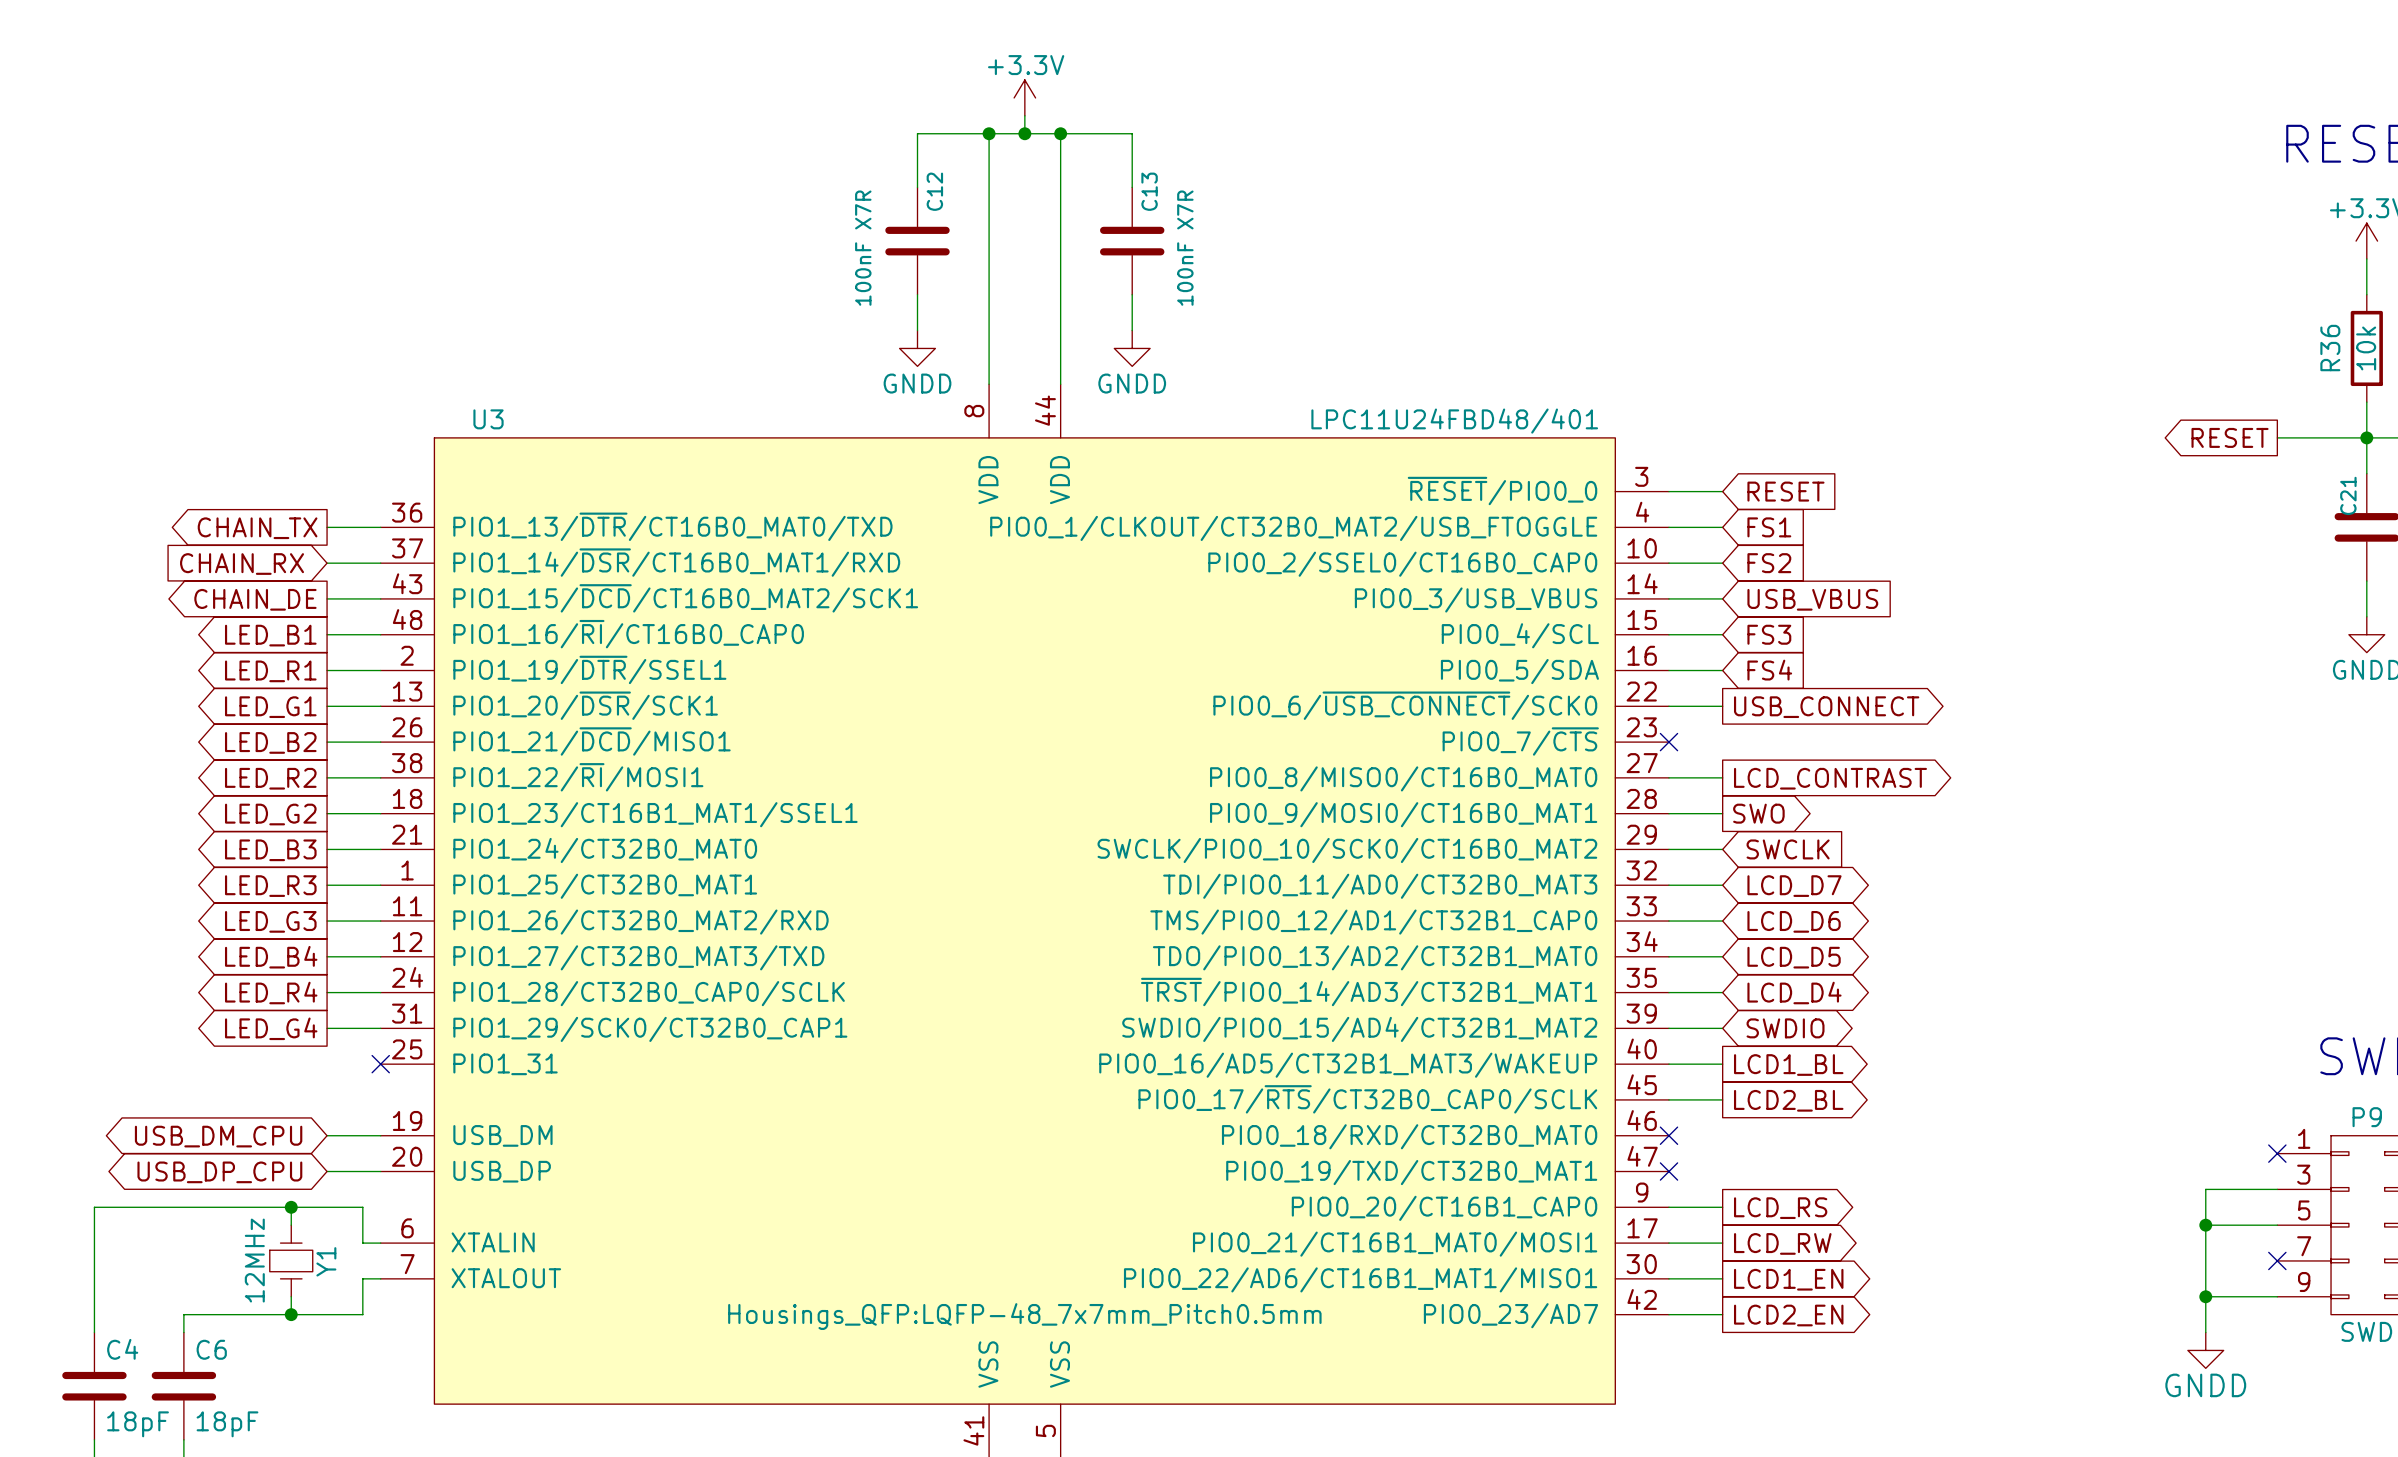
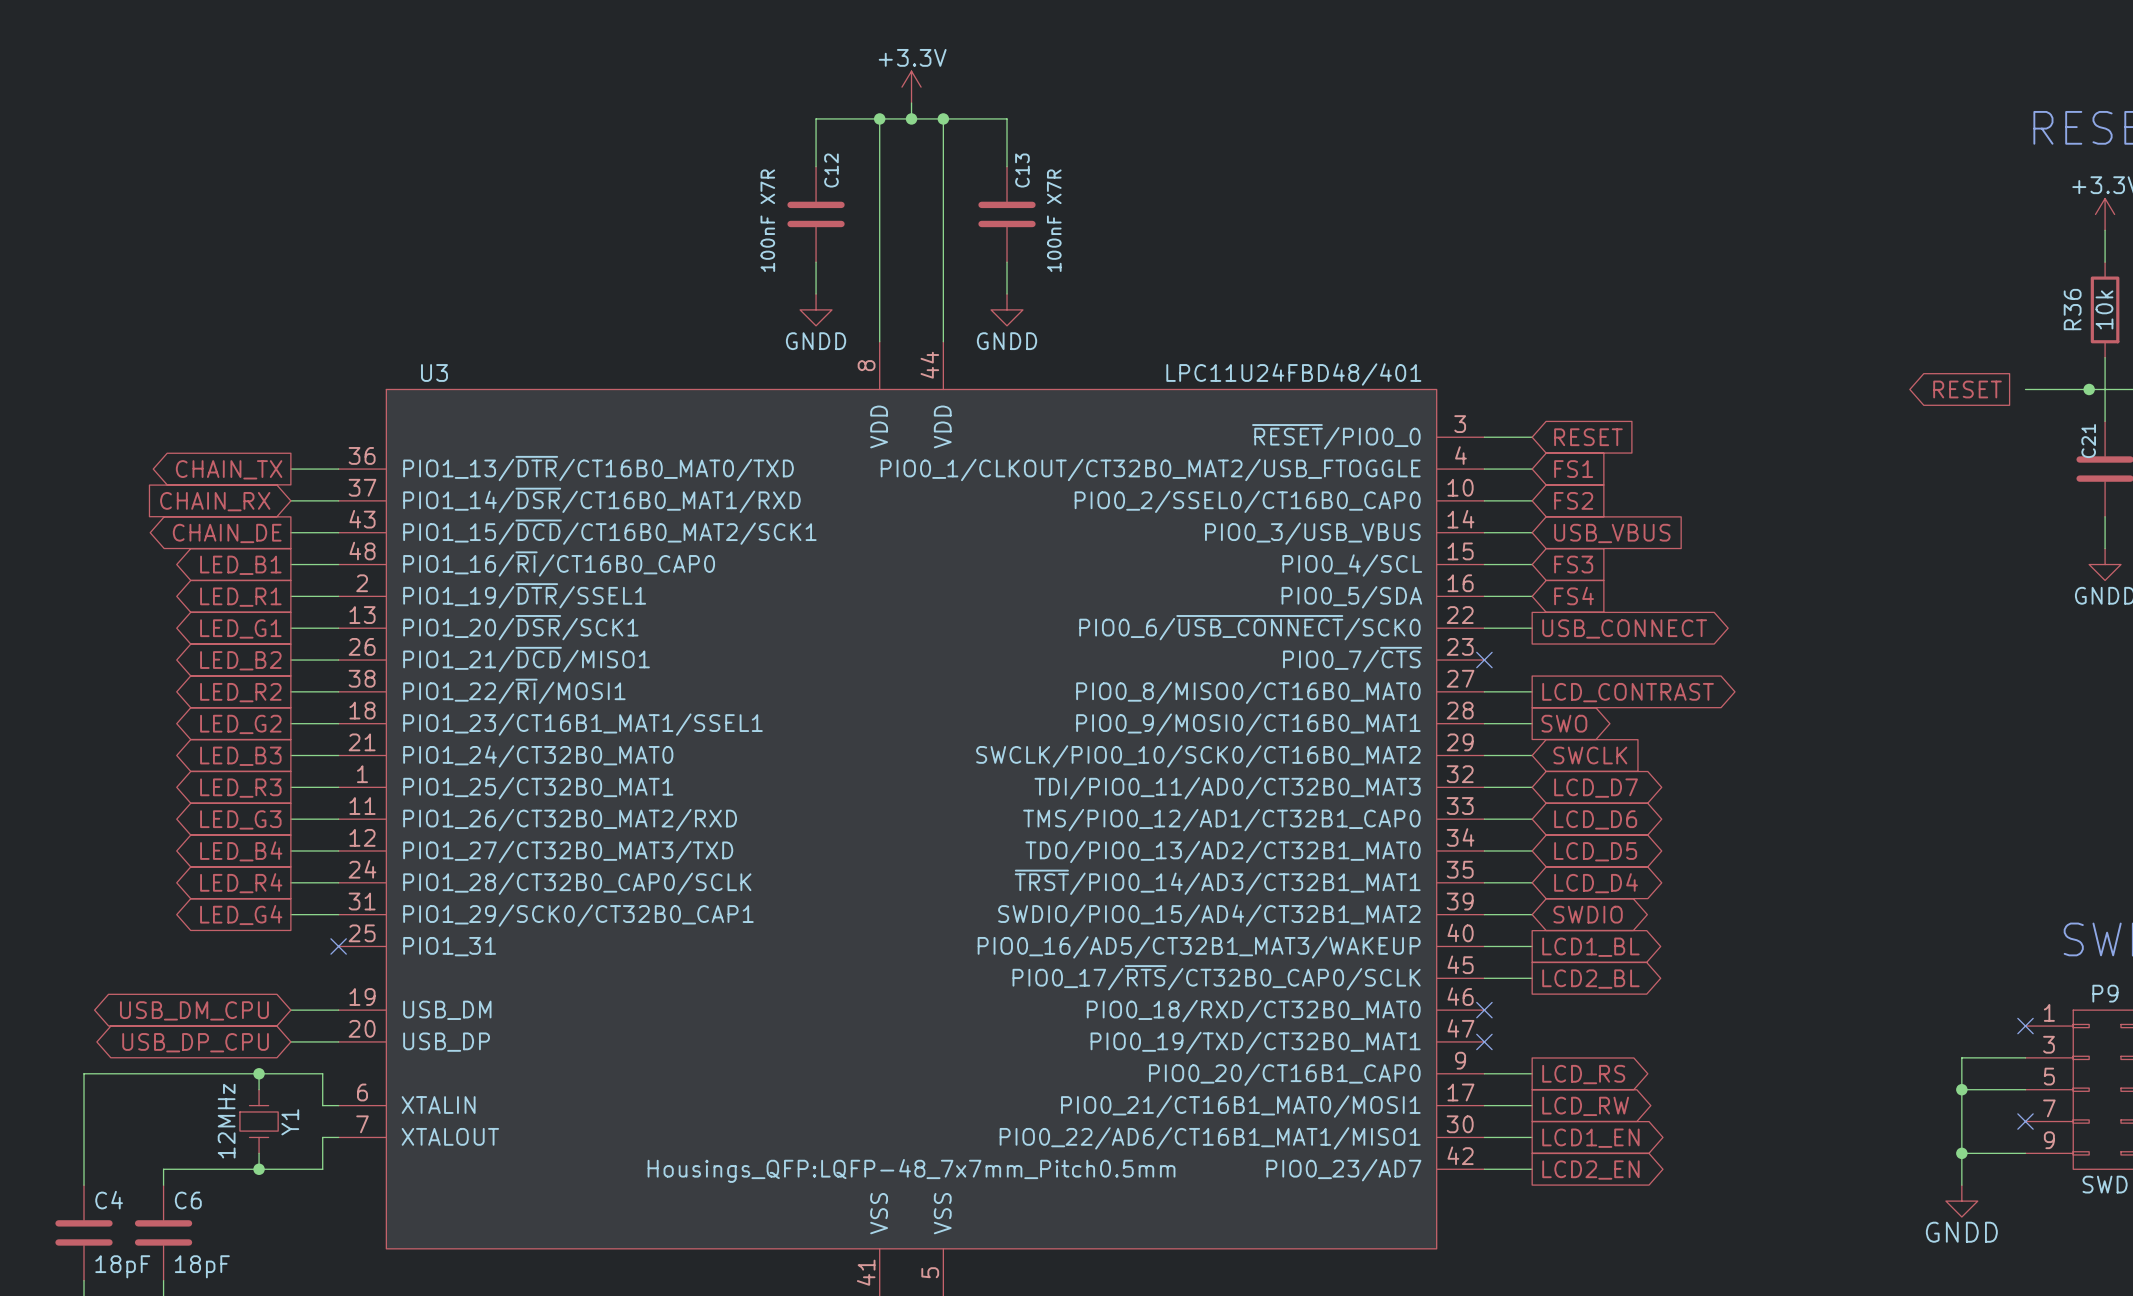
global label position: RESET (2230, 437) -> RESET (1967, 389)
junction position: (2366, 437) -> (2089, 389)

